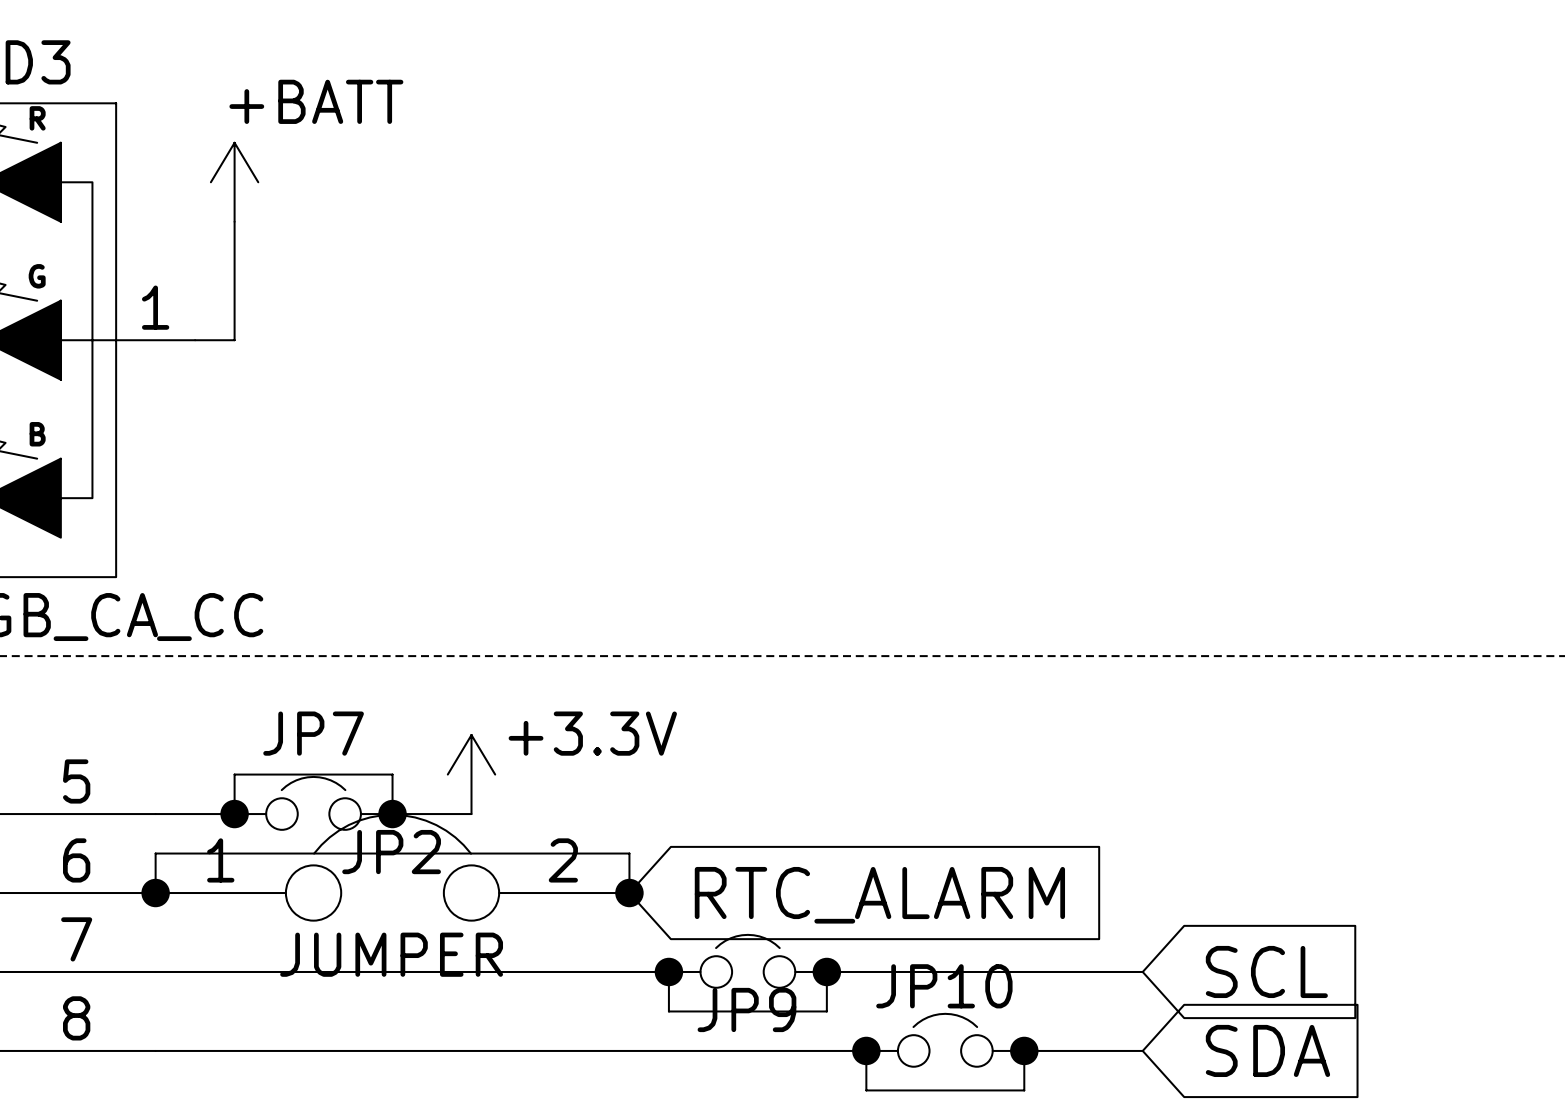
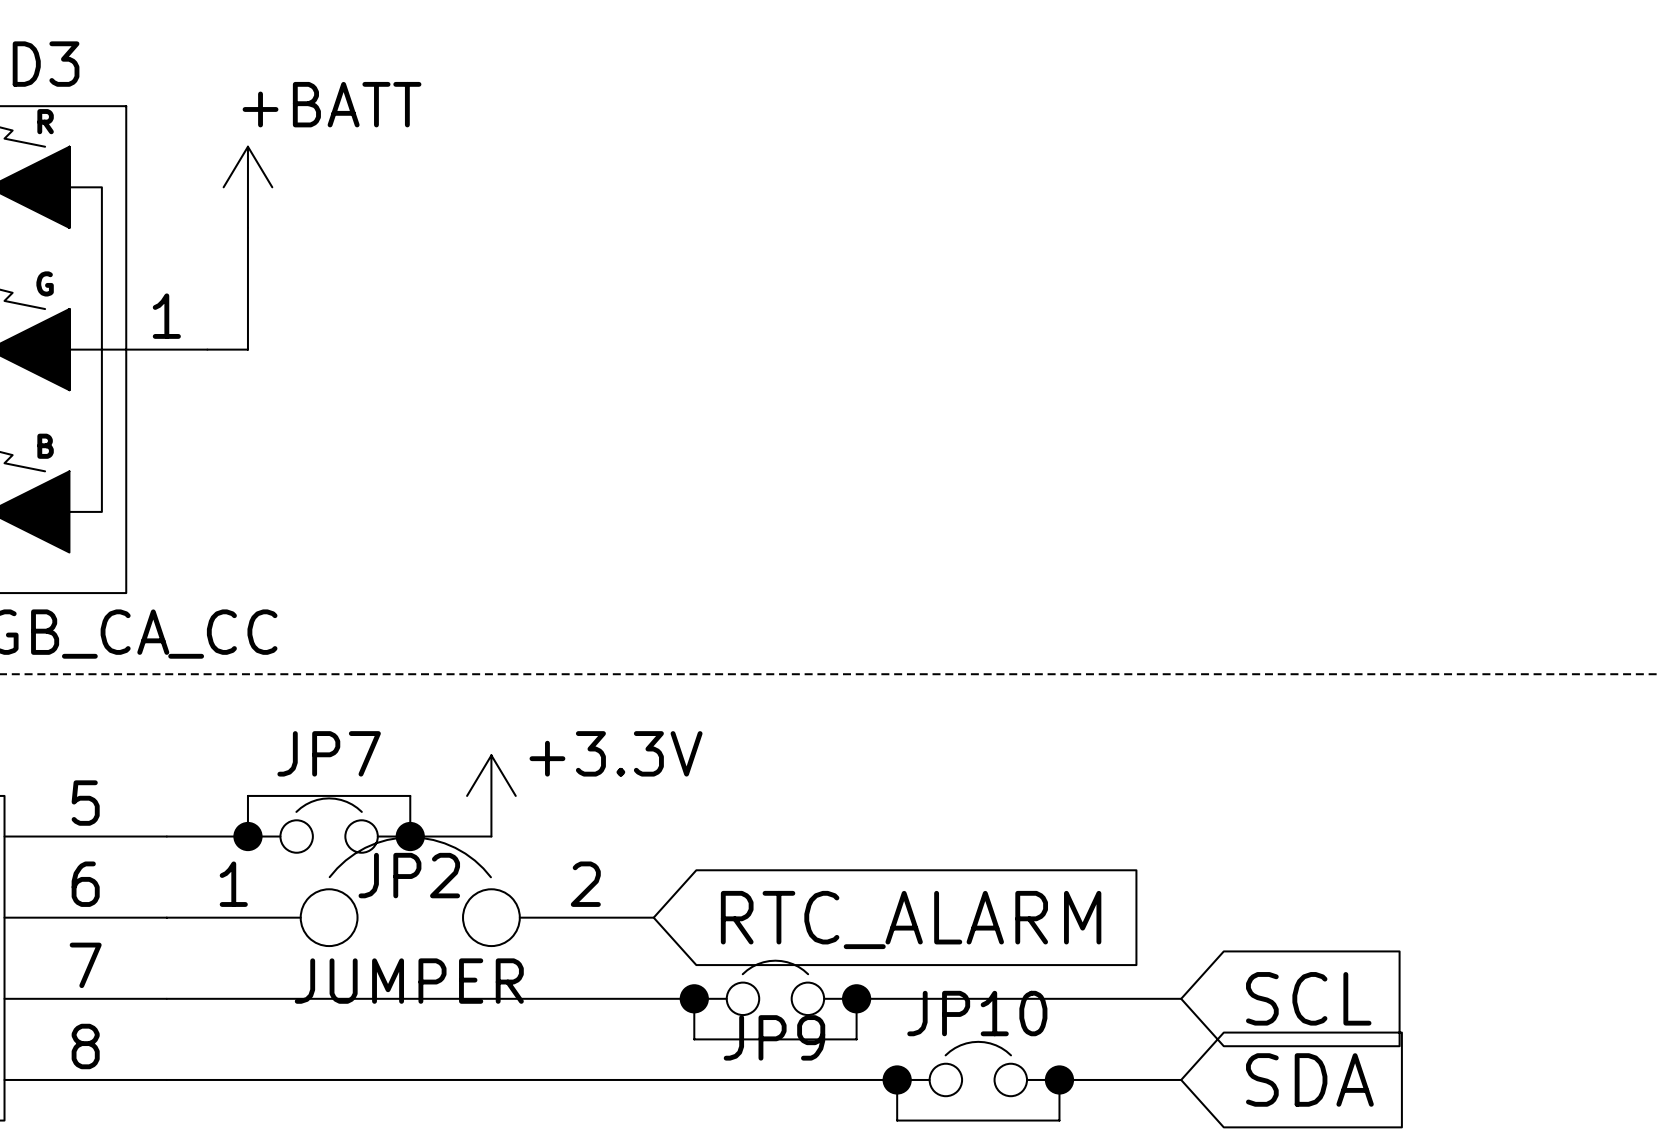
wire: (155, 893) (155, 853) (629, 853) (629, 893) -> none
junction: (155, 893) -> none
junction: (629, 893) -> none

